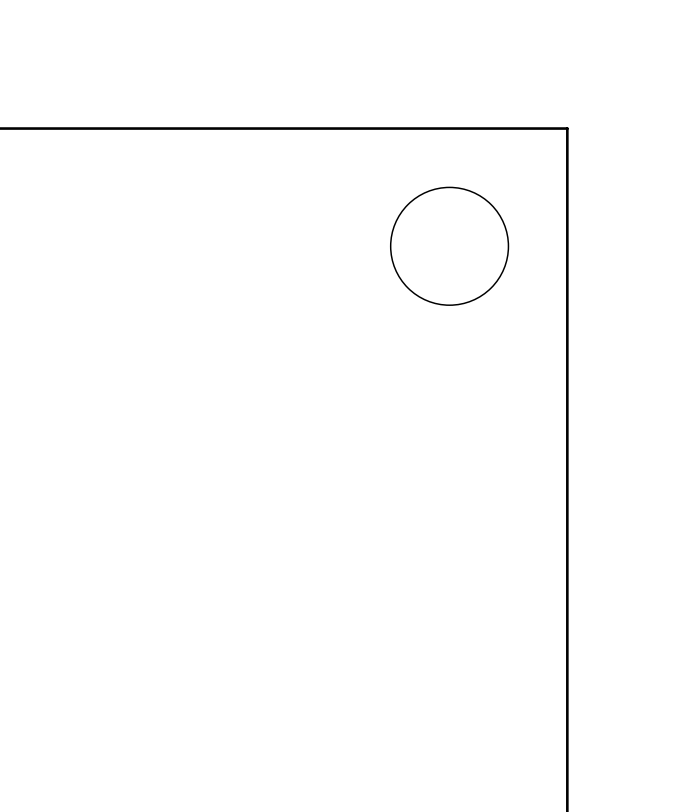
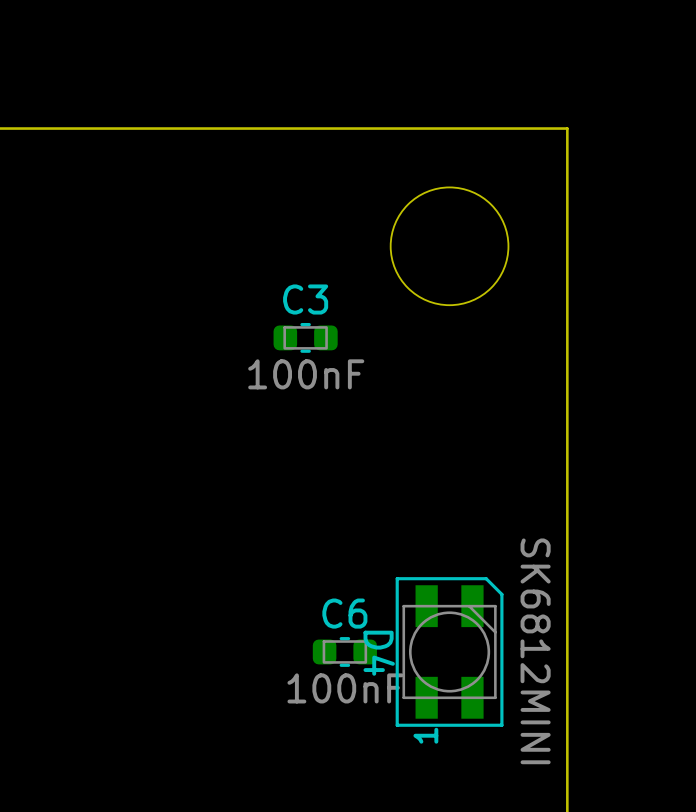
C3: none -> 100nF (305, 337)
C6: none -> 100nF (344, 651)
D4: none -> SK6812MINI (449, 651)

